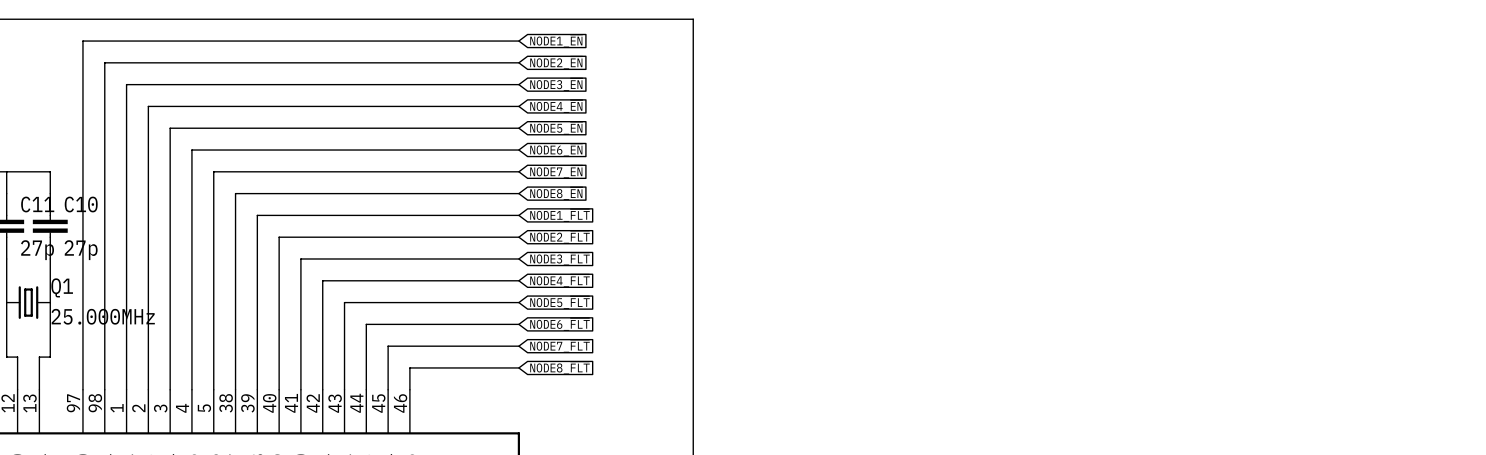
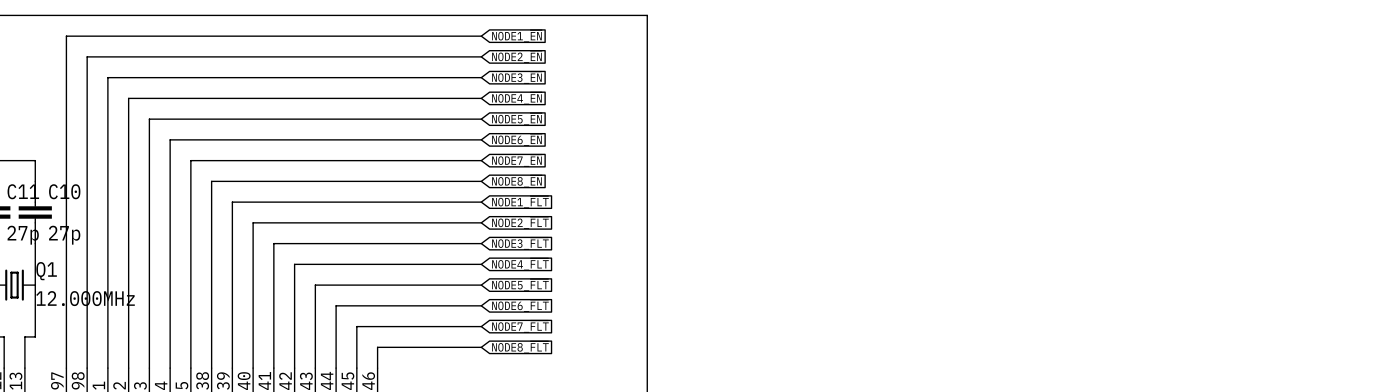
Q1 value: 25.000MHz (103, 316) -> 12.000MHz (85, 298)

